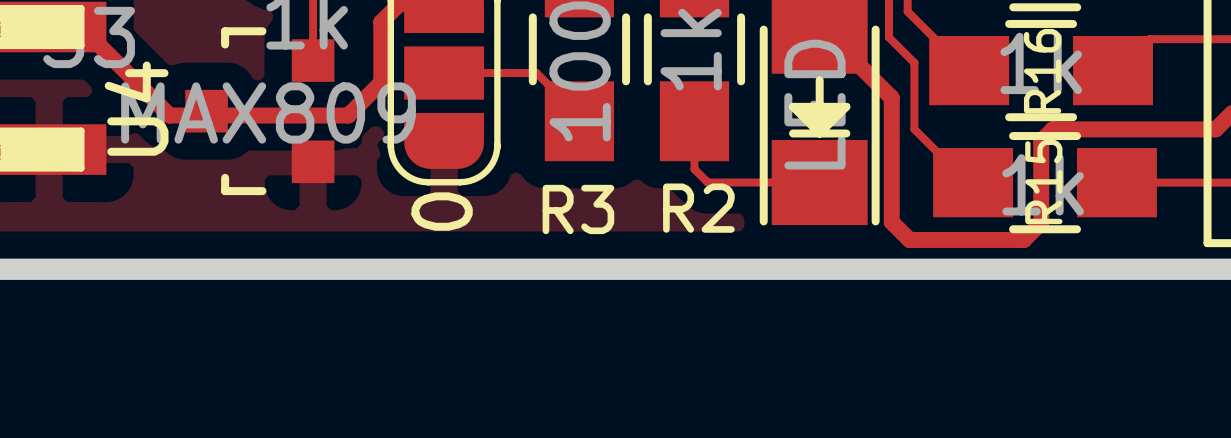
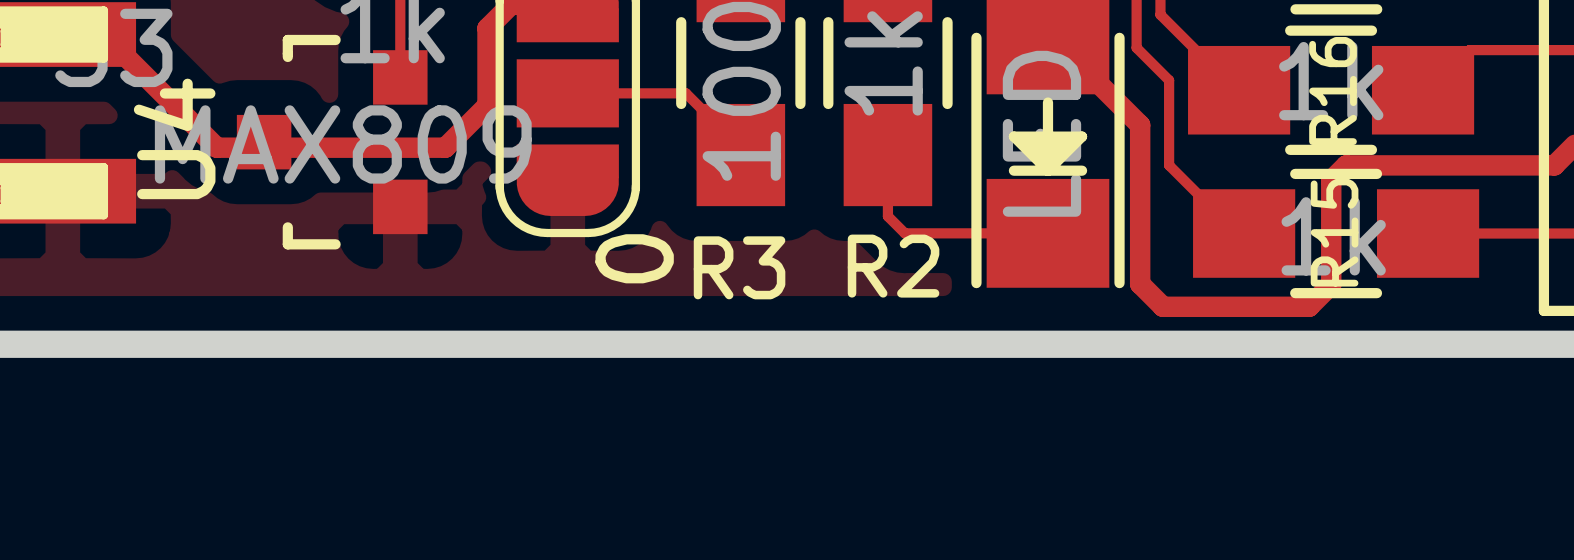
part text position: 0 (442, 211) -> 0 (634, 258)

